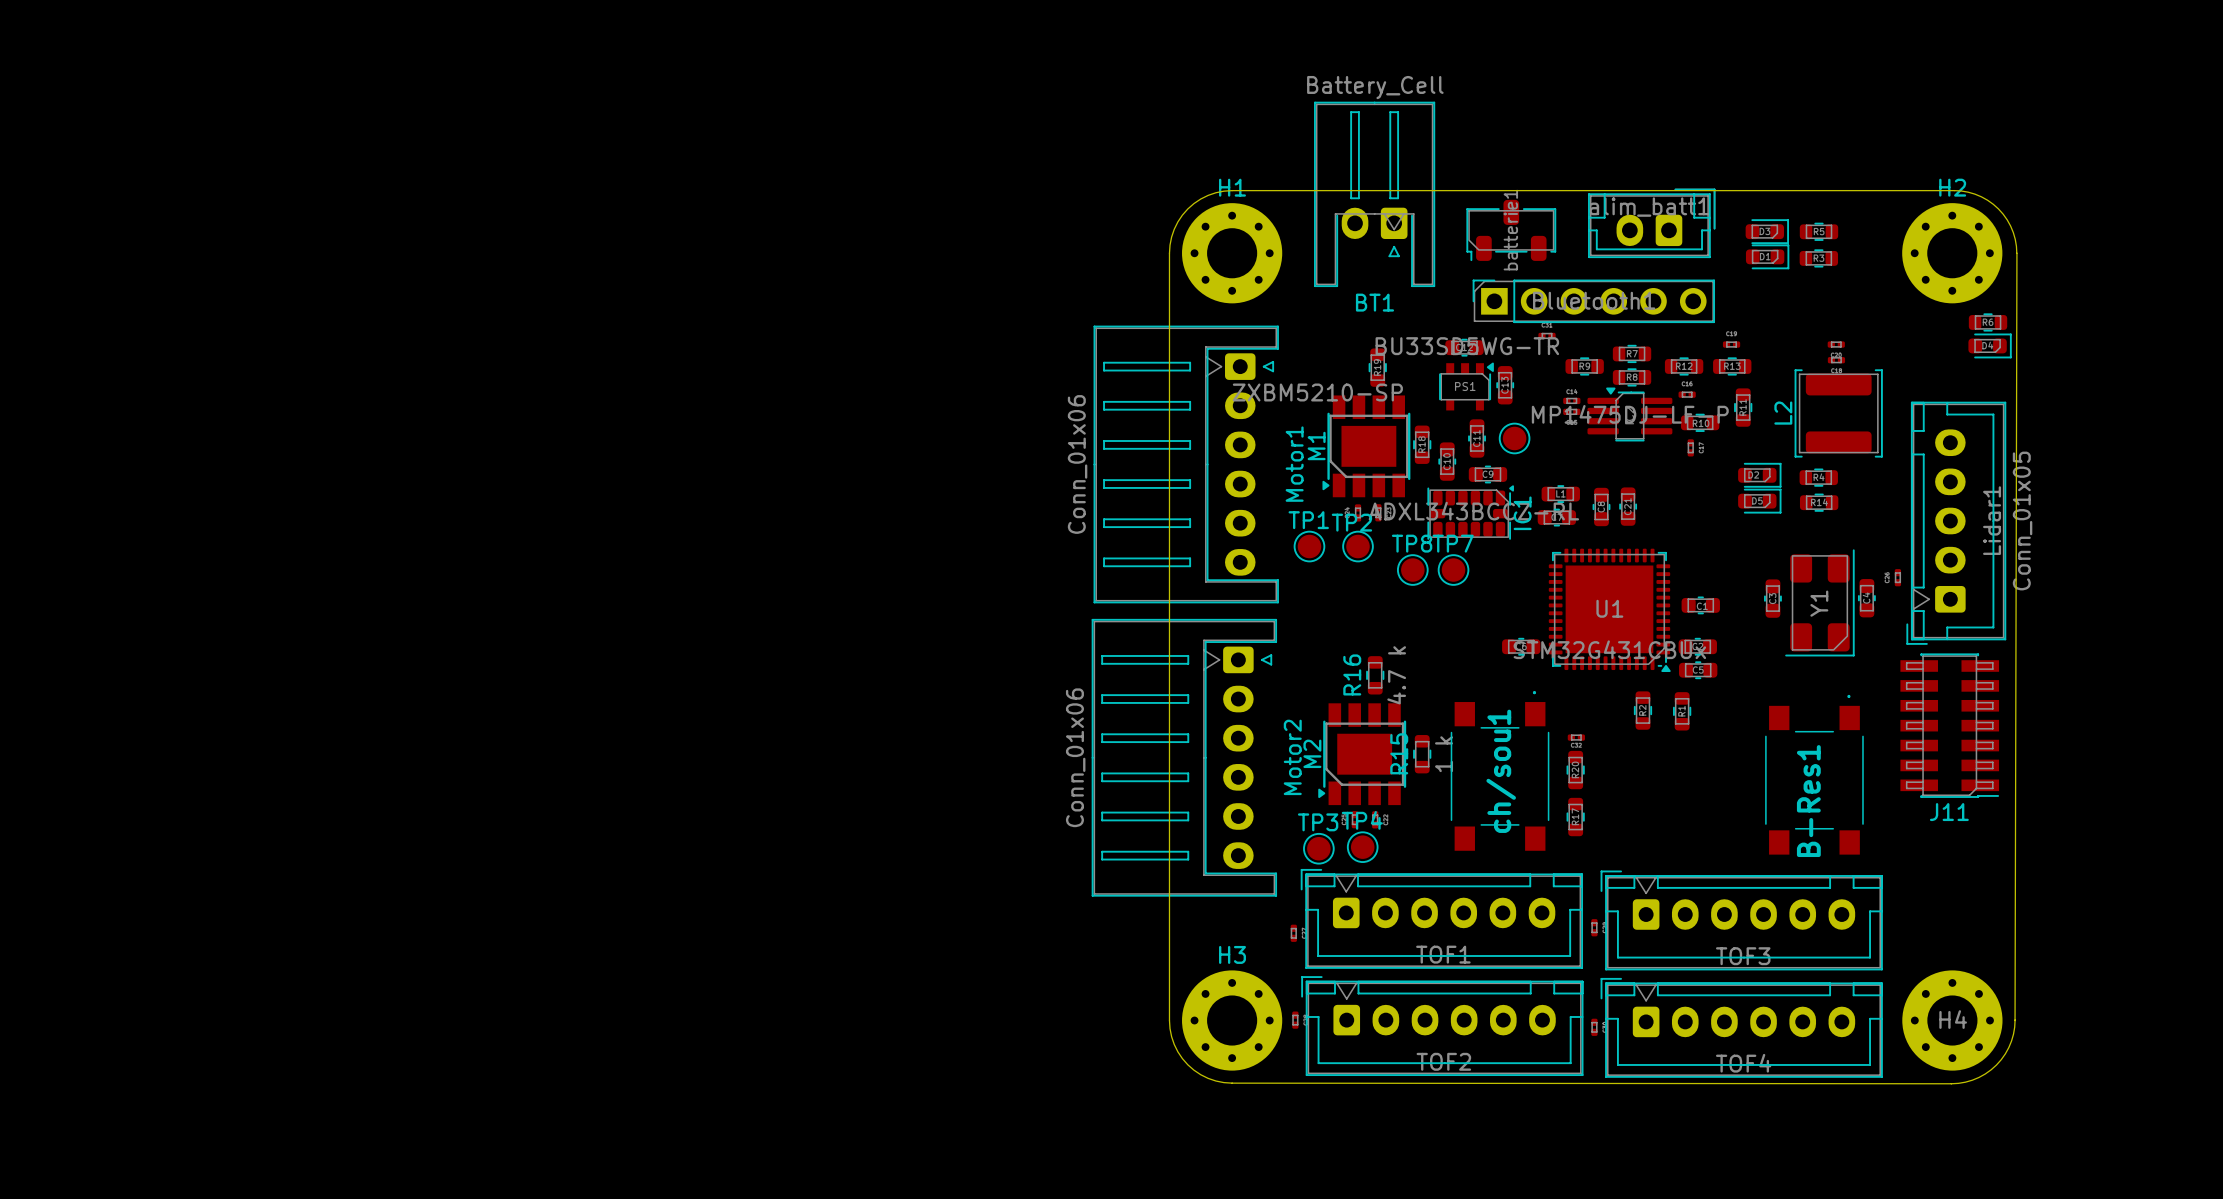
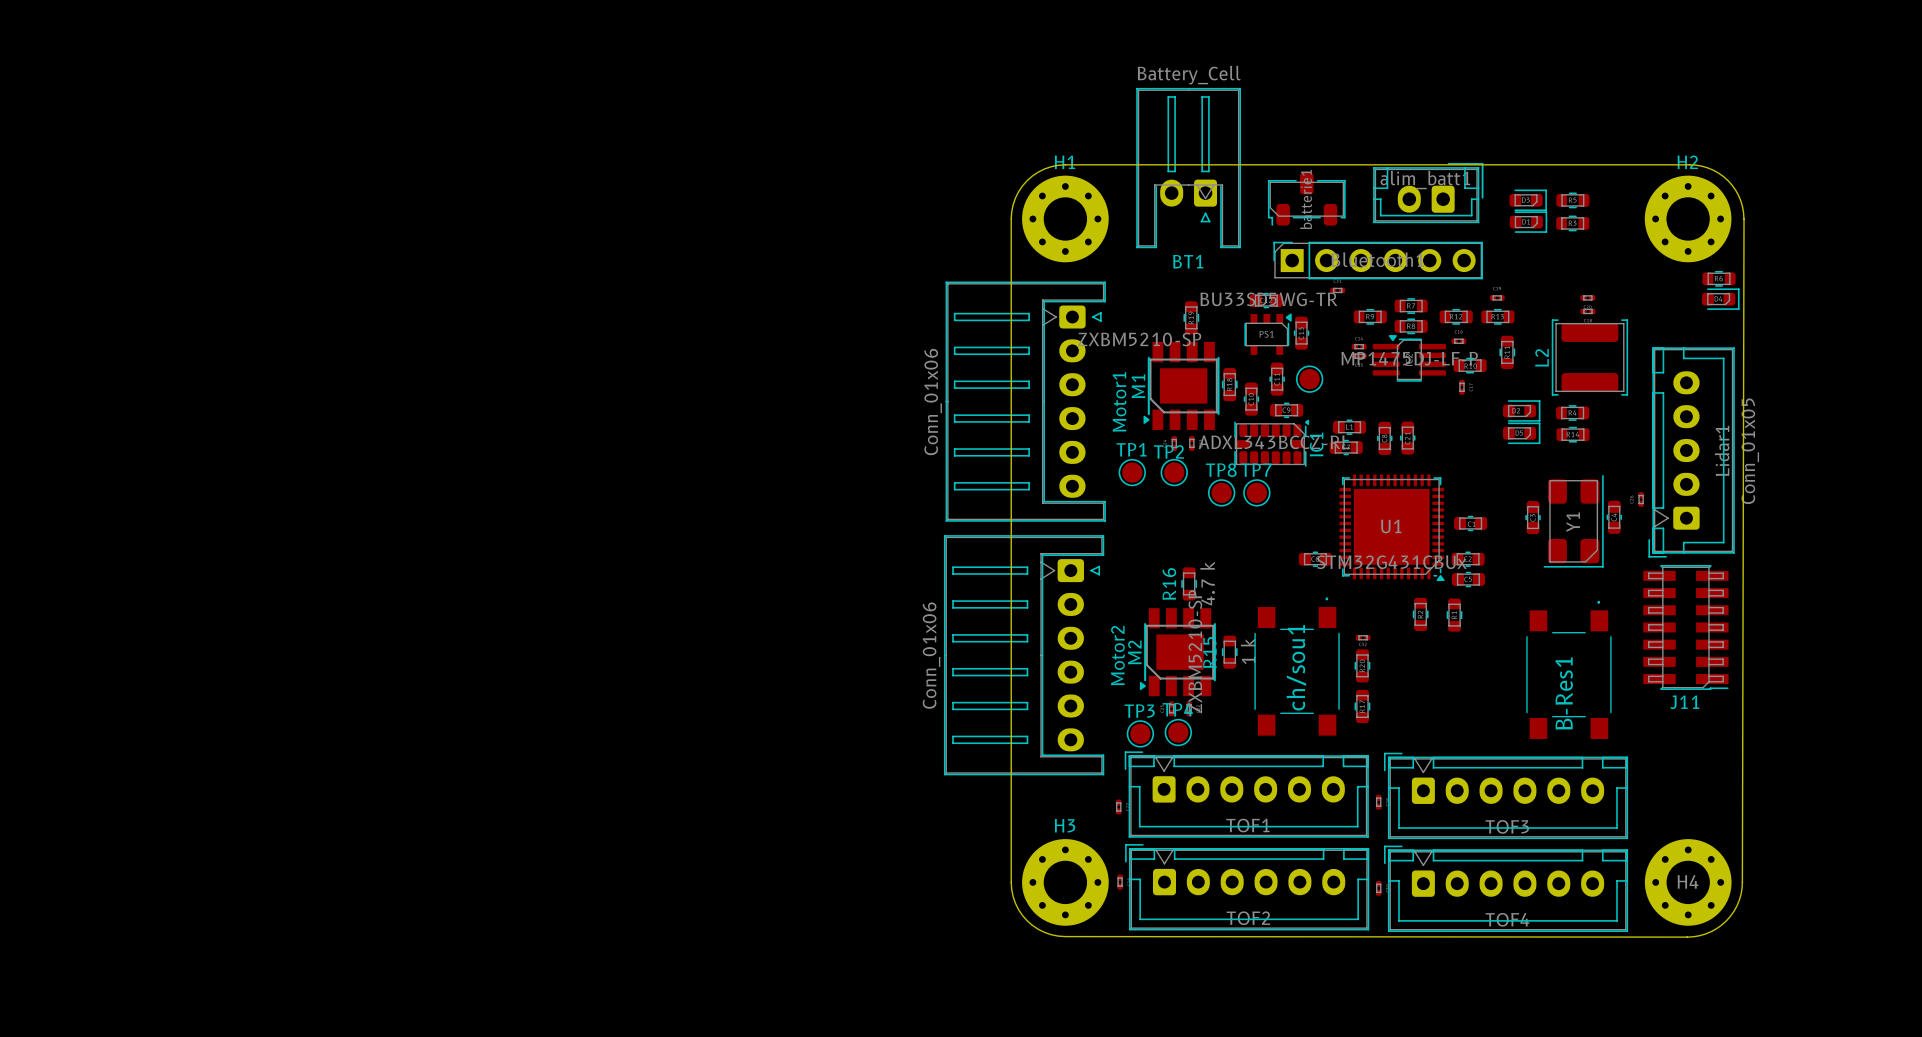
M2 value: none -> ZXBM5210-SP (1195, 651)

